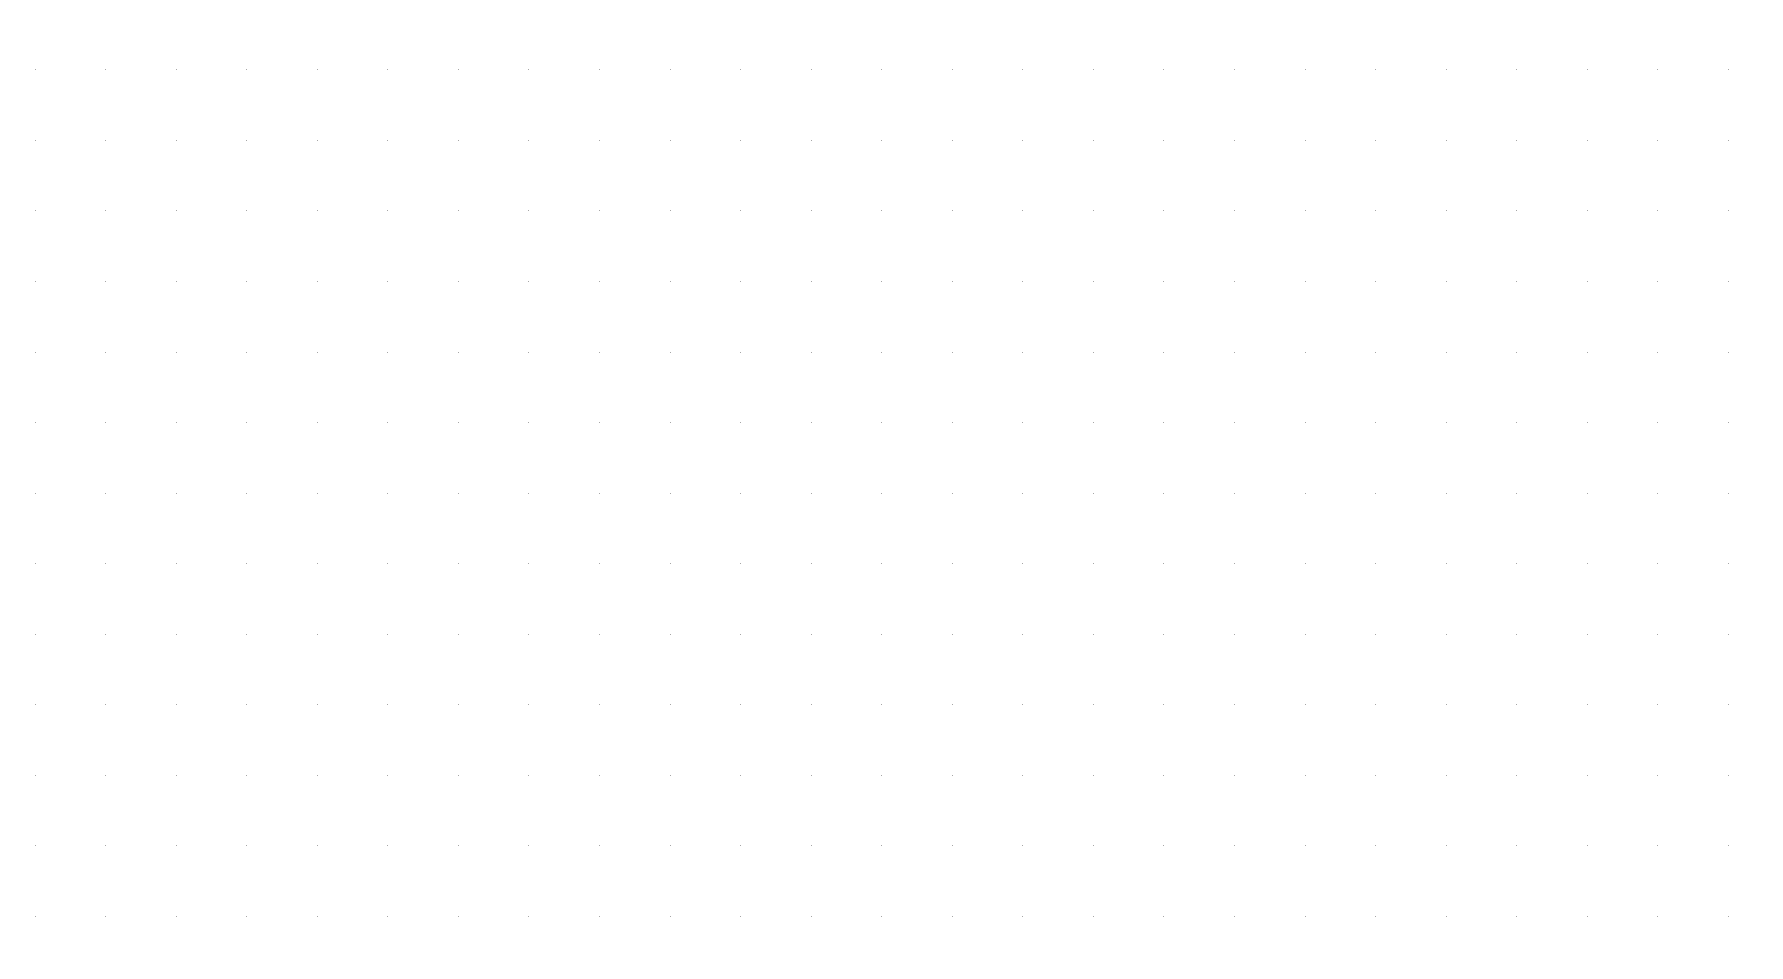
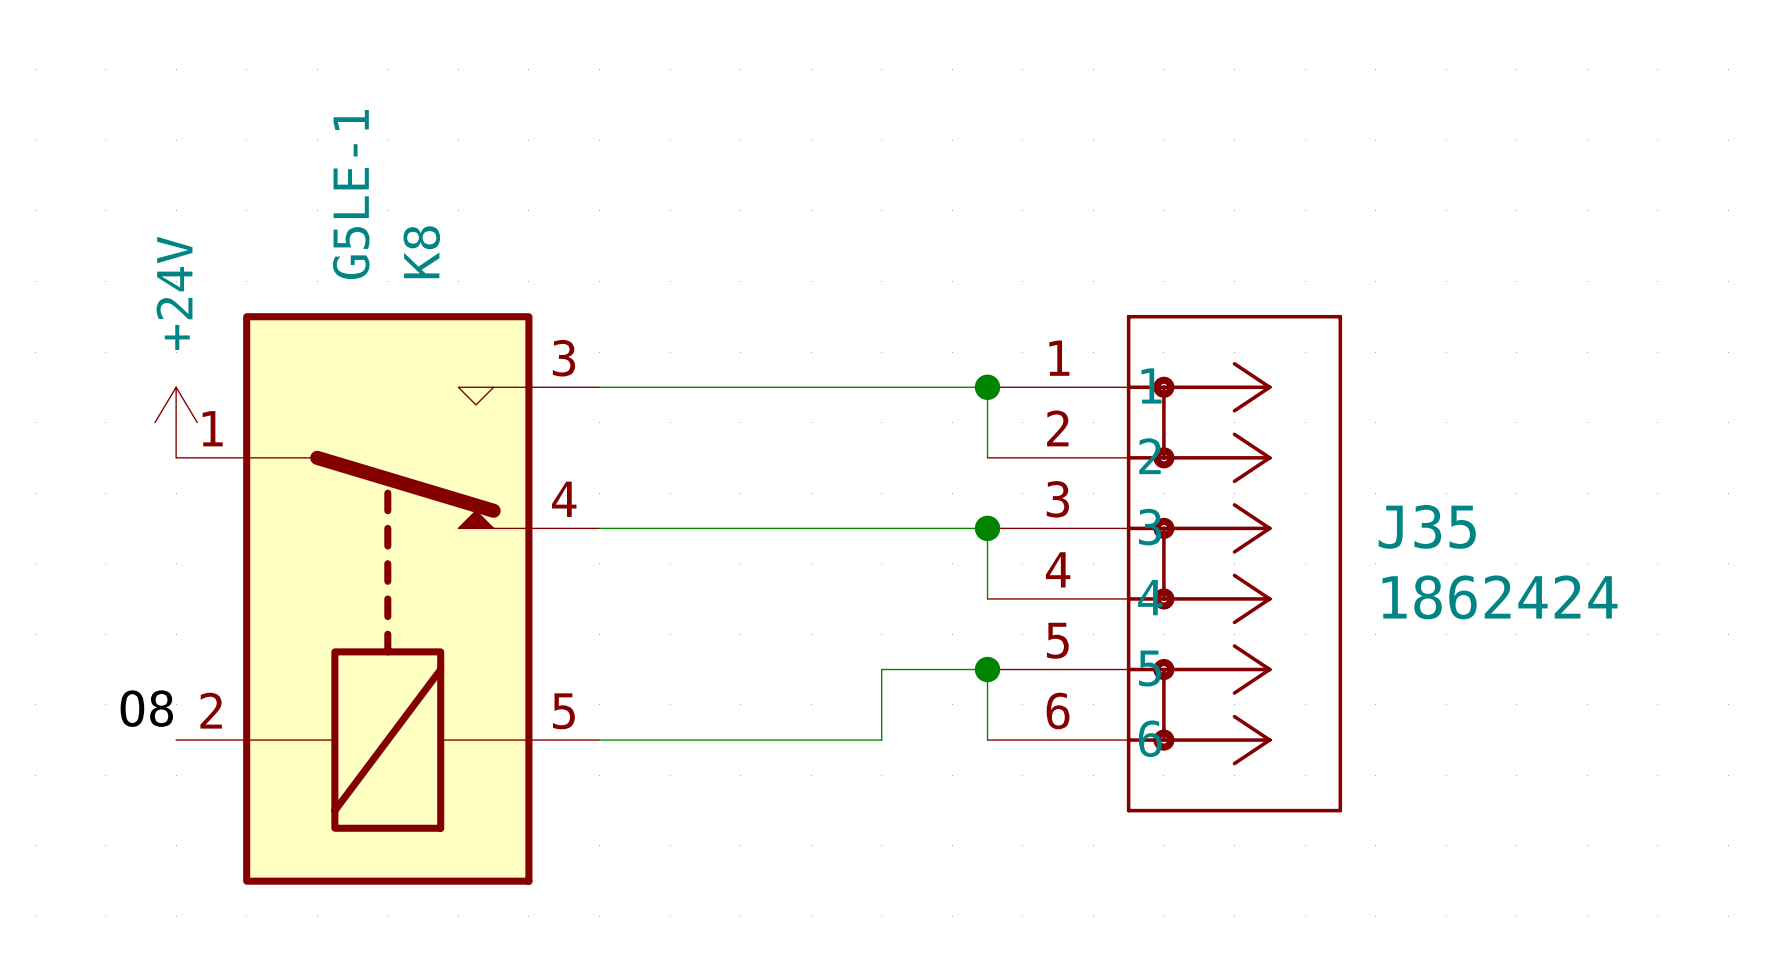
wire: none -> (599, 387) (987, 387) (987, 457)
junction: none -> (987, 387)
power symbol: none -> +24V (176, 422)
wire: none -> (599, 528) (987, 528) (987, 598)
junction: none -> (987, 528)
J35: none -> 1862424 (1164, 563)
K8: none -> G5LE-1 (387, 598)
junction: none -> (987, 669)
label: none -> O8 (146, 708)
wire: none -> (599, 740) (881, 740) (881, 669) (987, 669) (987, 740)

